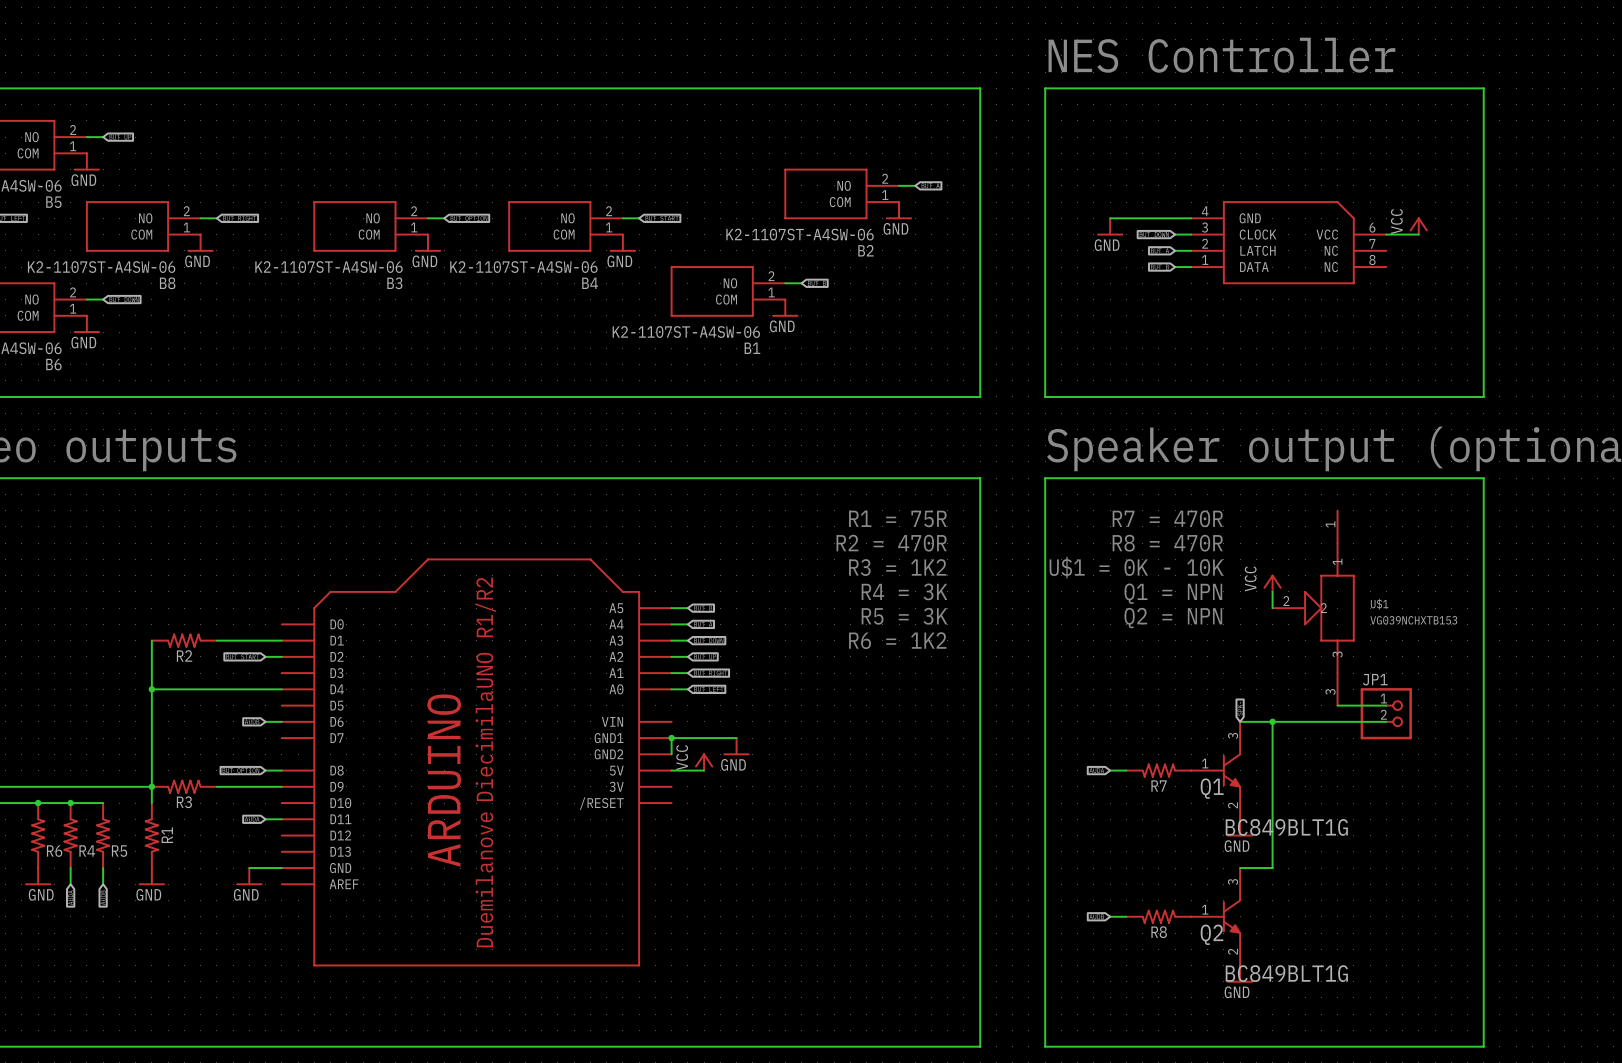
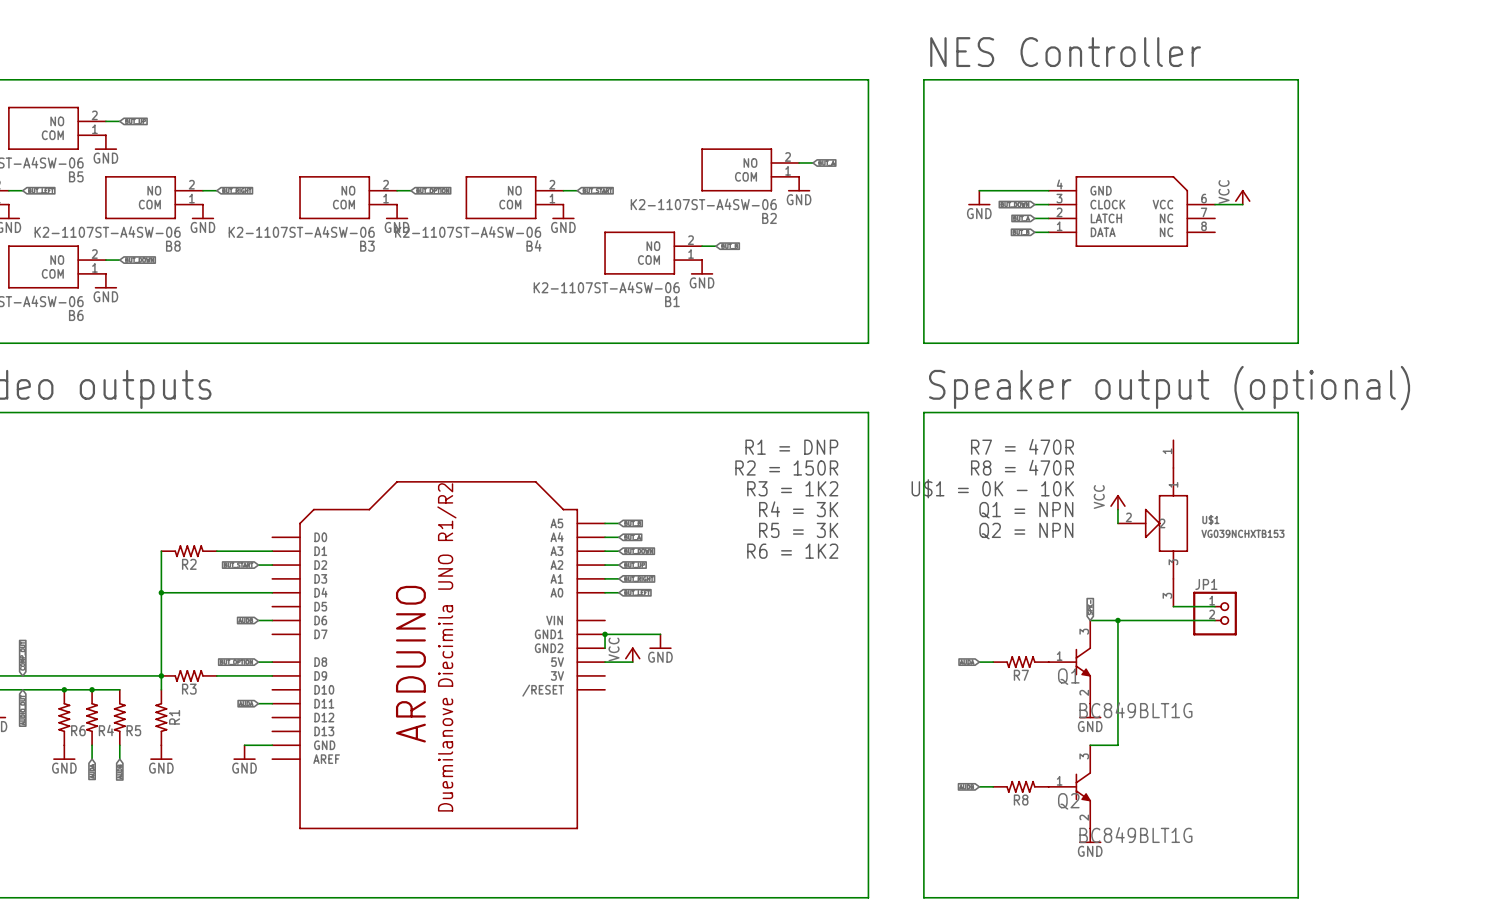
text: R1 = 75R (897, 518) -> R1 = DNP (791, 447)
text: R2 = 470R (891, 543) -> R2 = 150R (786, 467)

